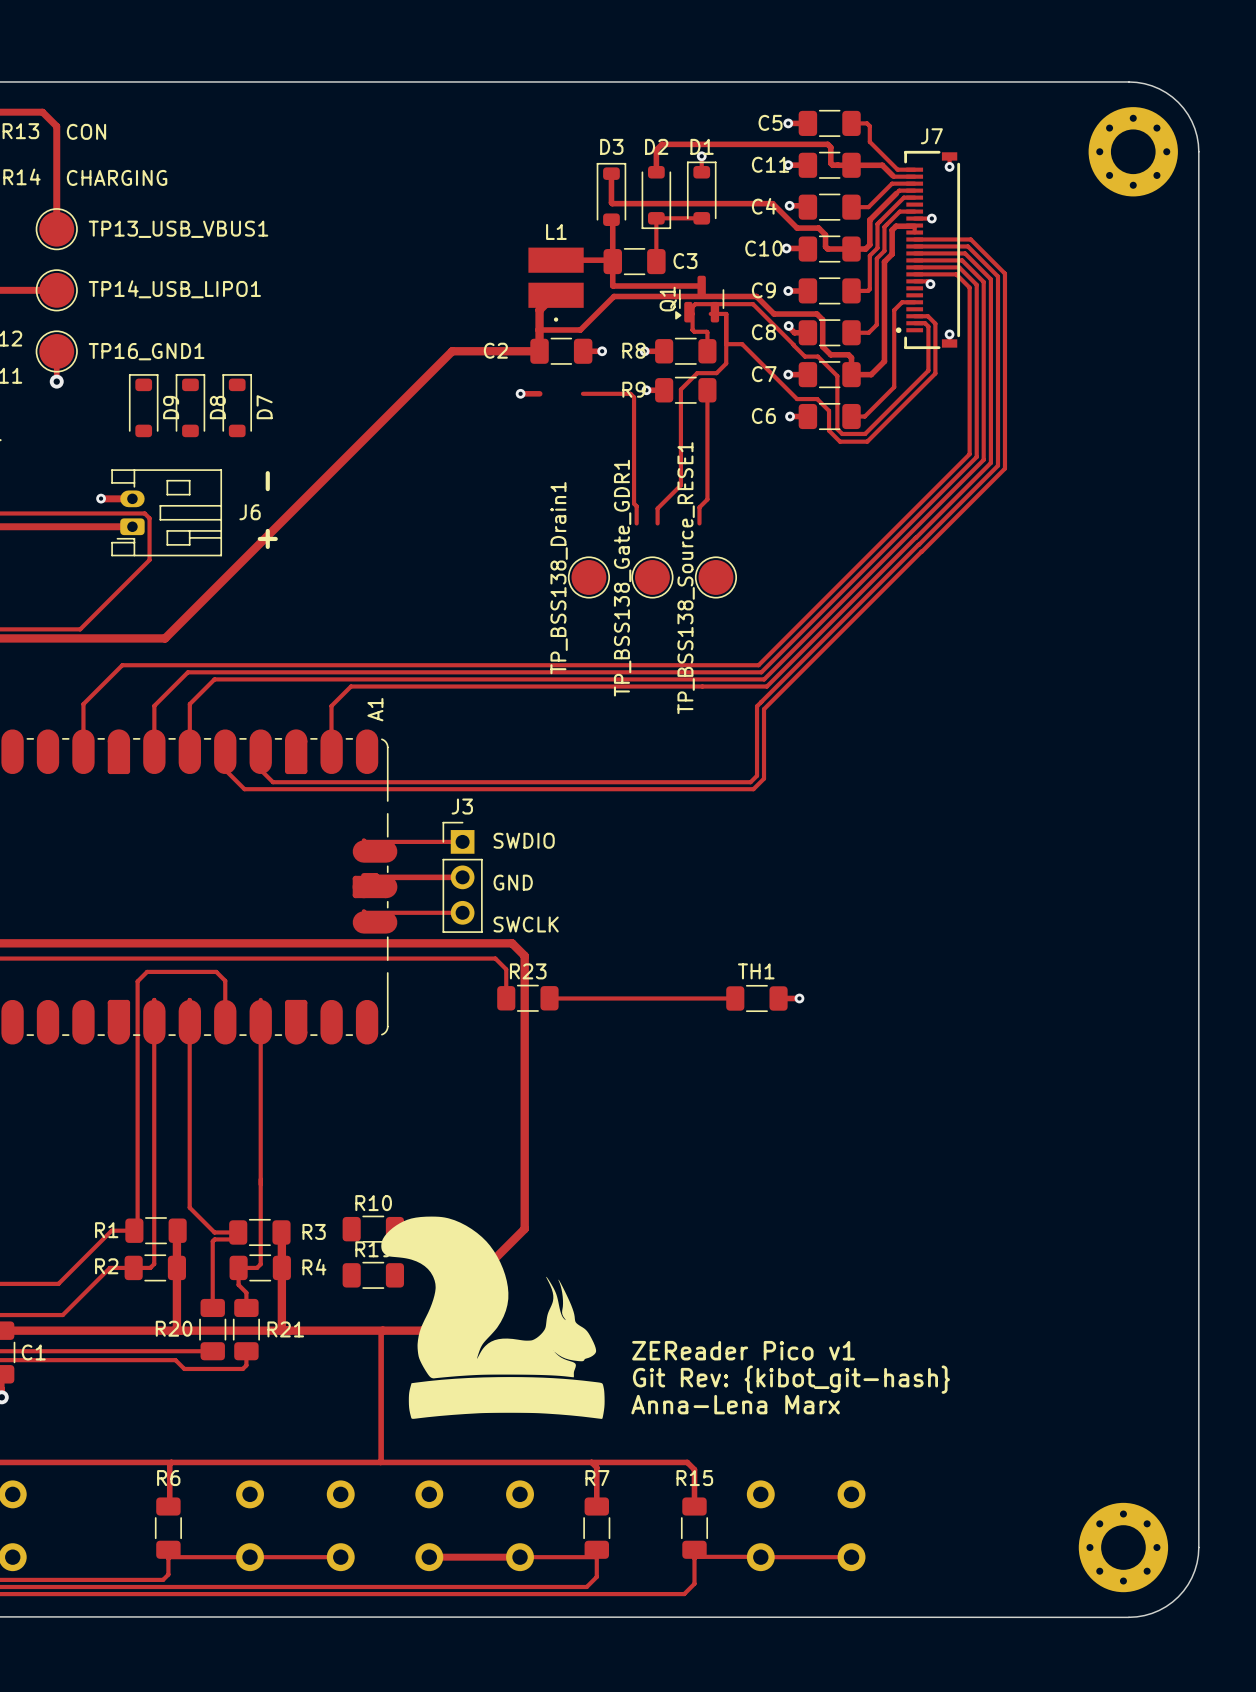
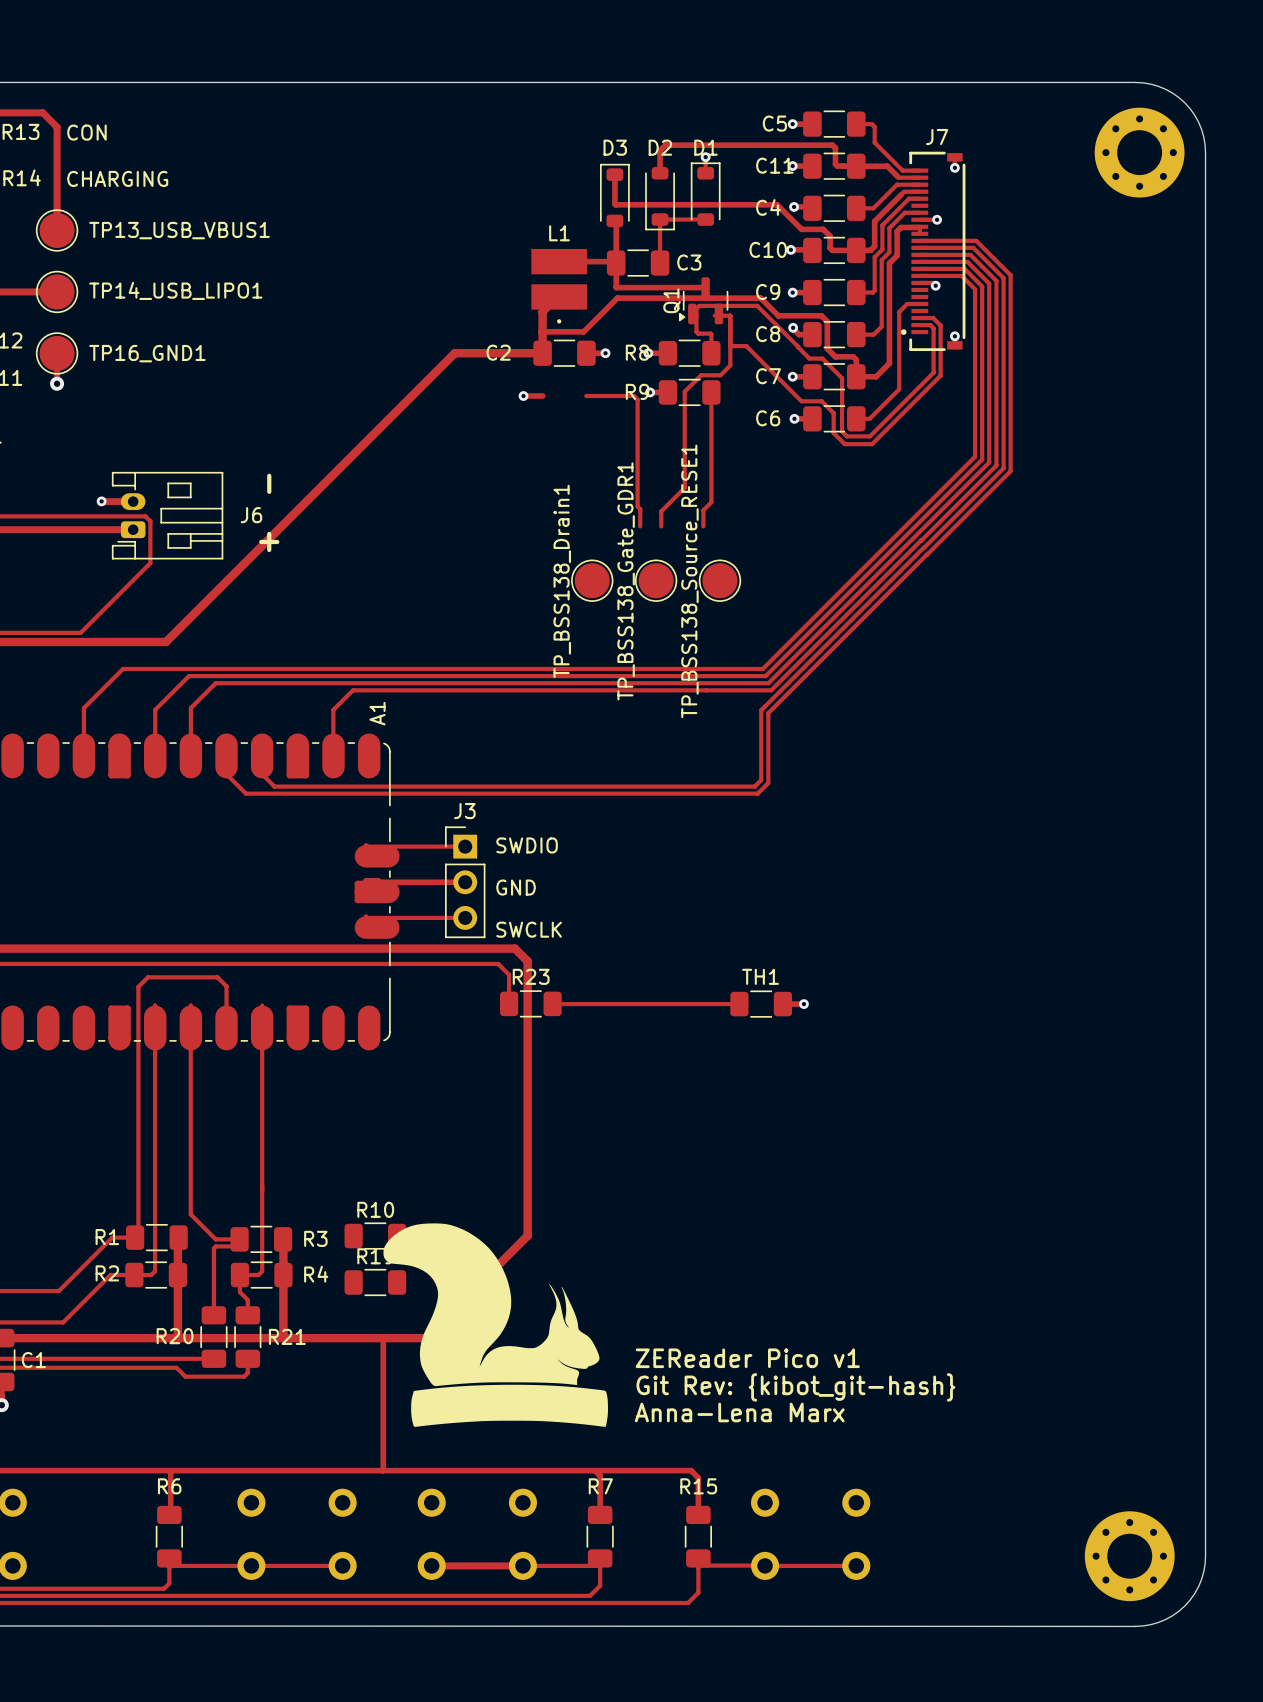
D9: (143, 405) -> none
D8: (190, 405) -> none
D7: (237, 405) -> none

